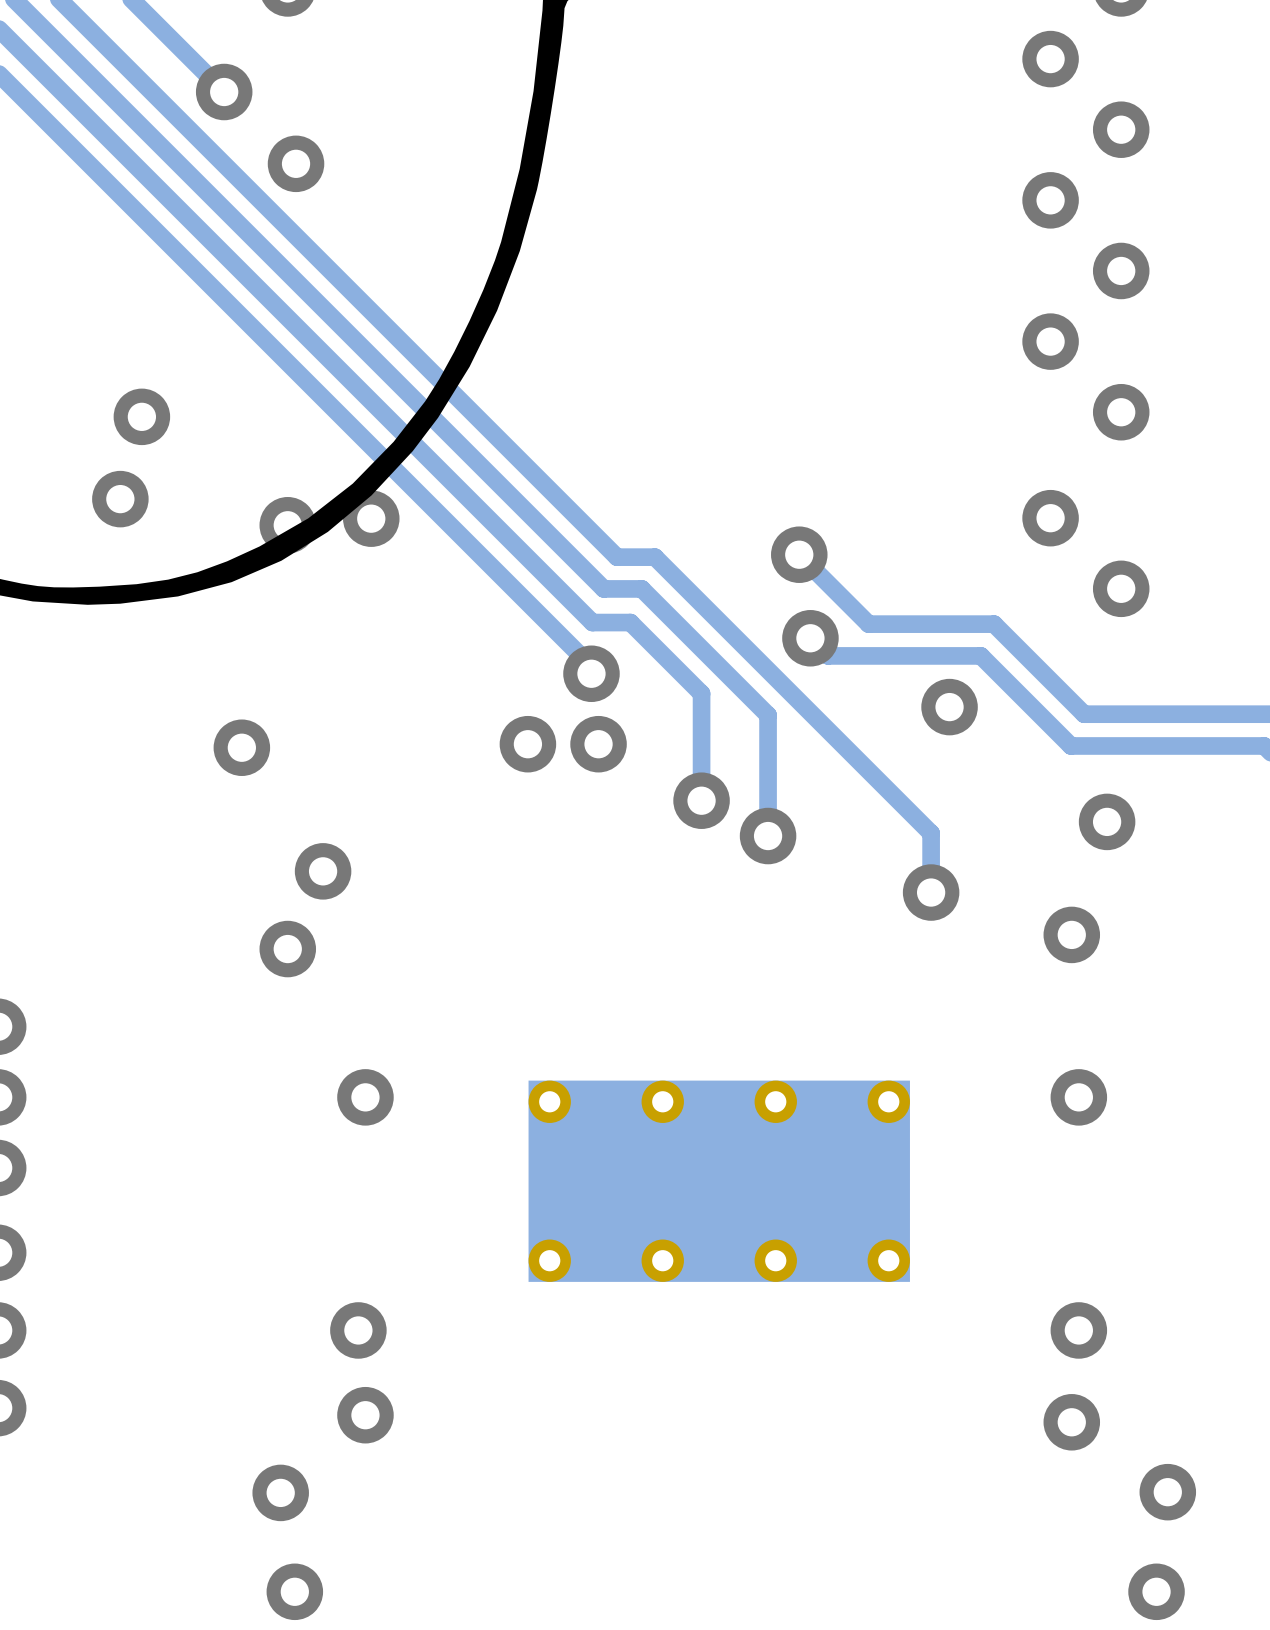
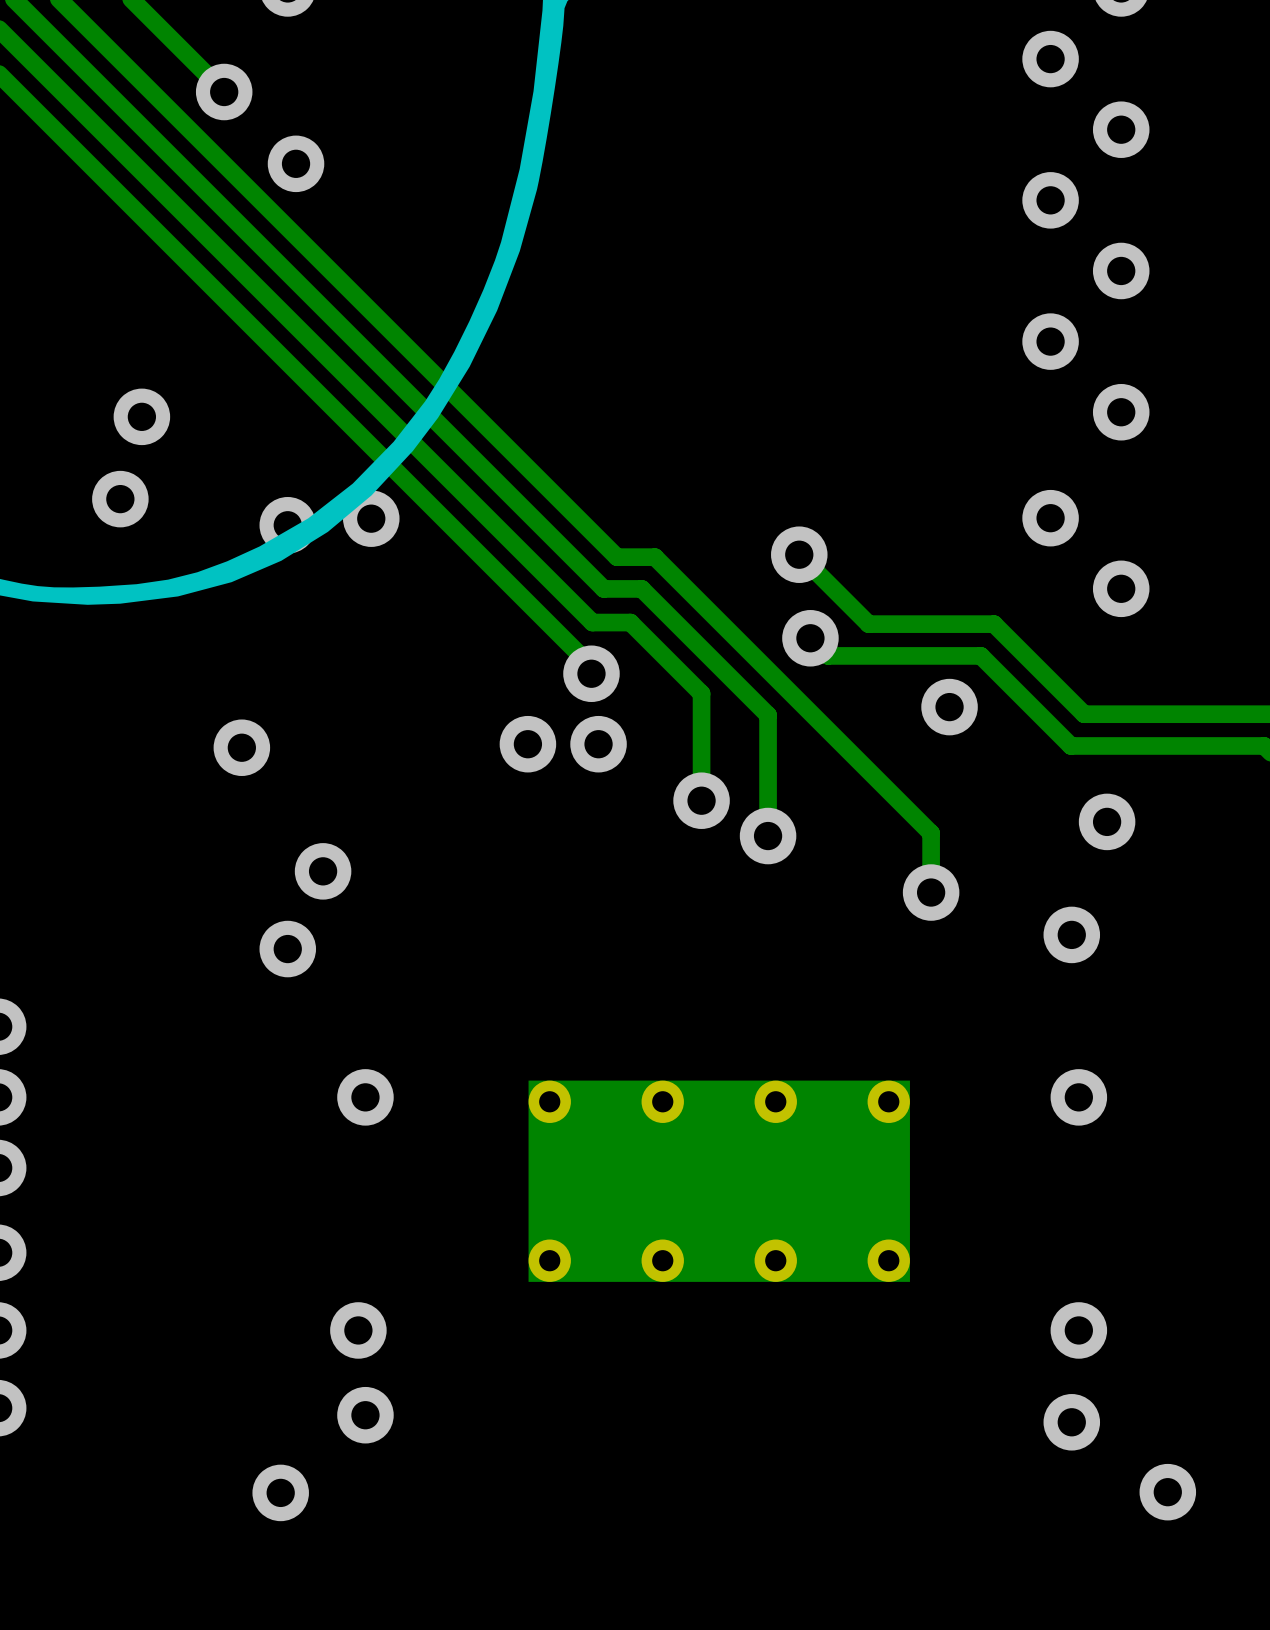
via: (294, 1591) -> none
via: (1156, 1591) -> none

